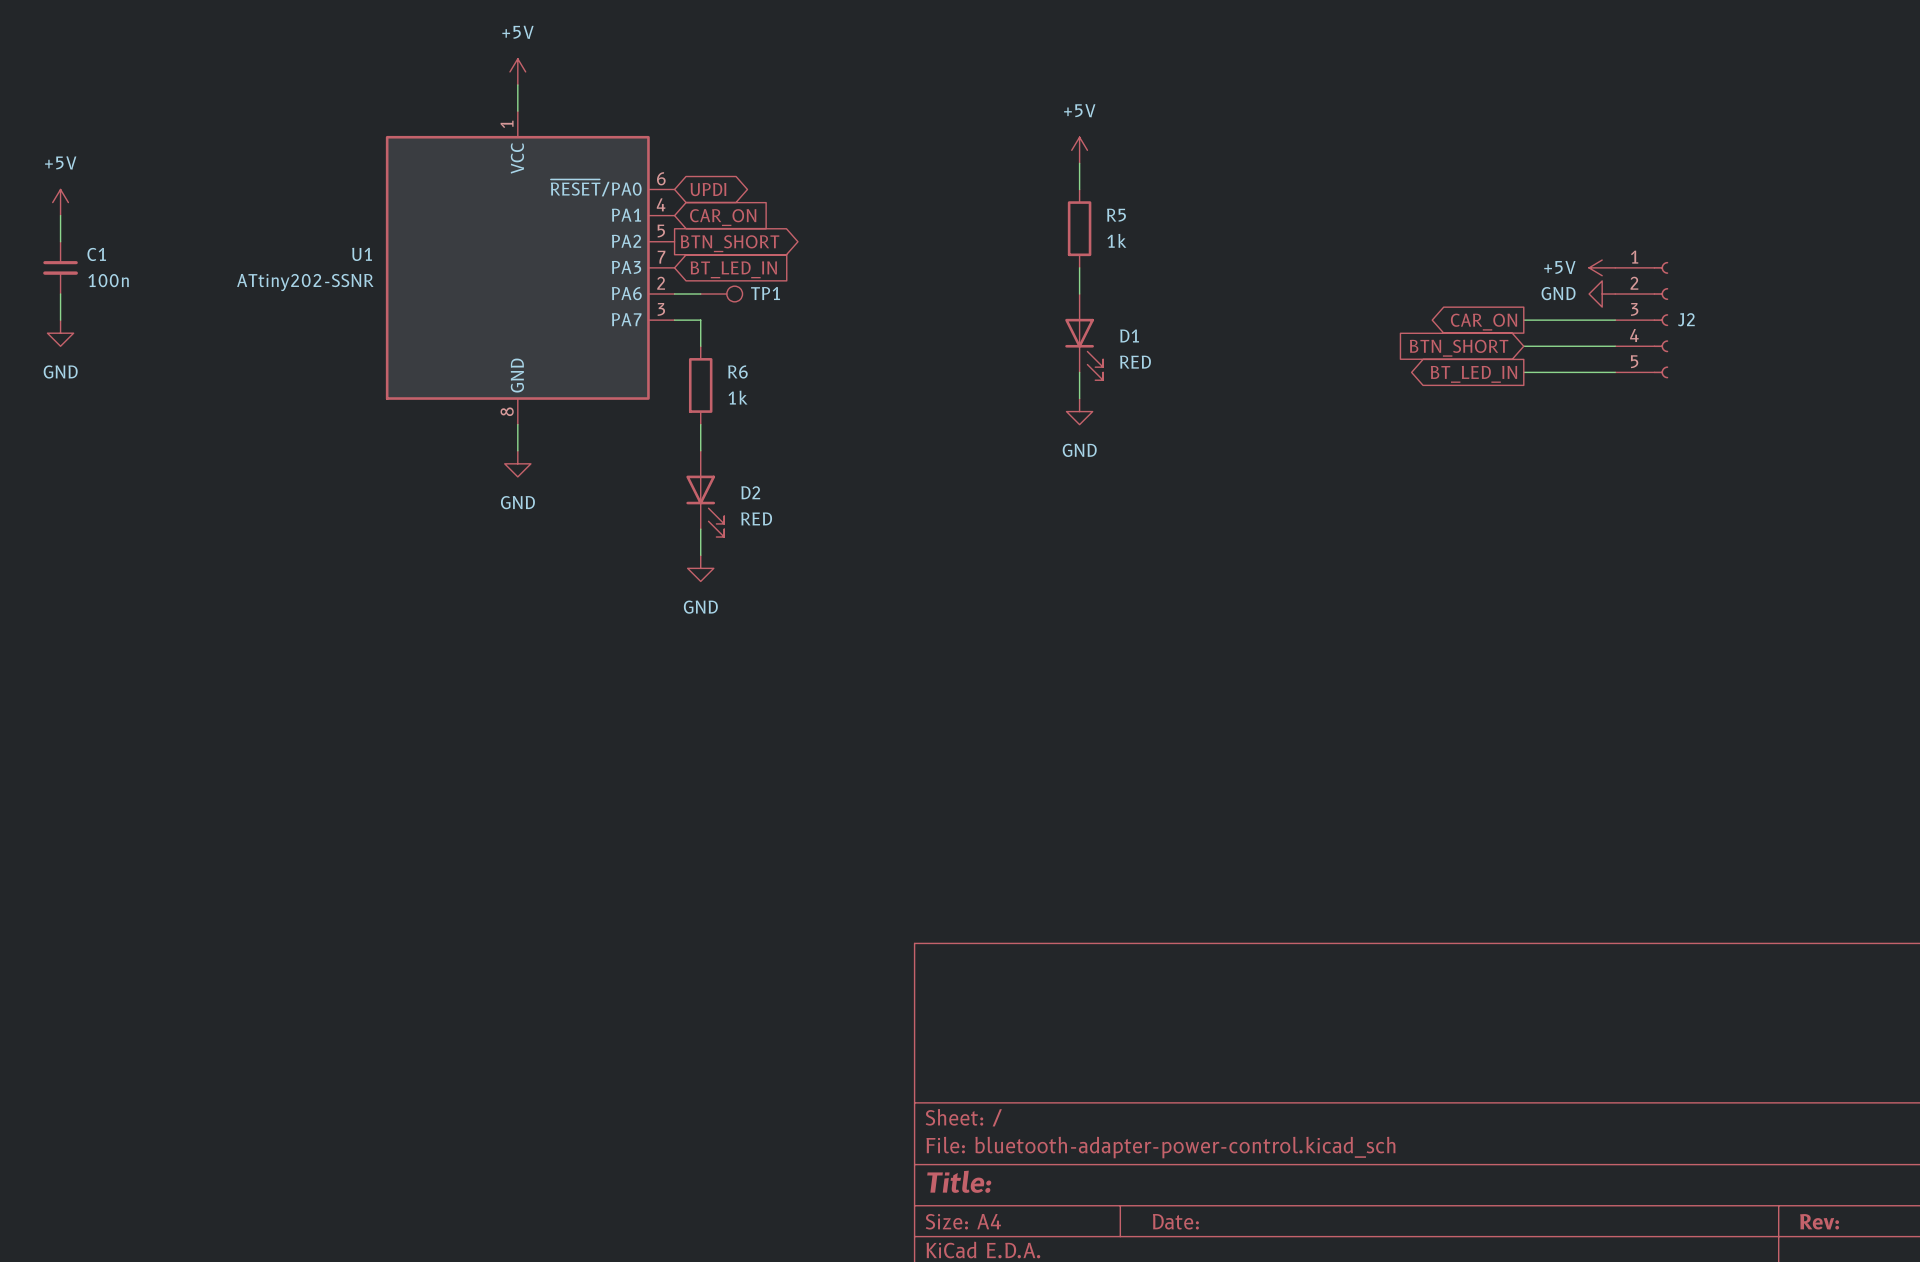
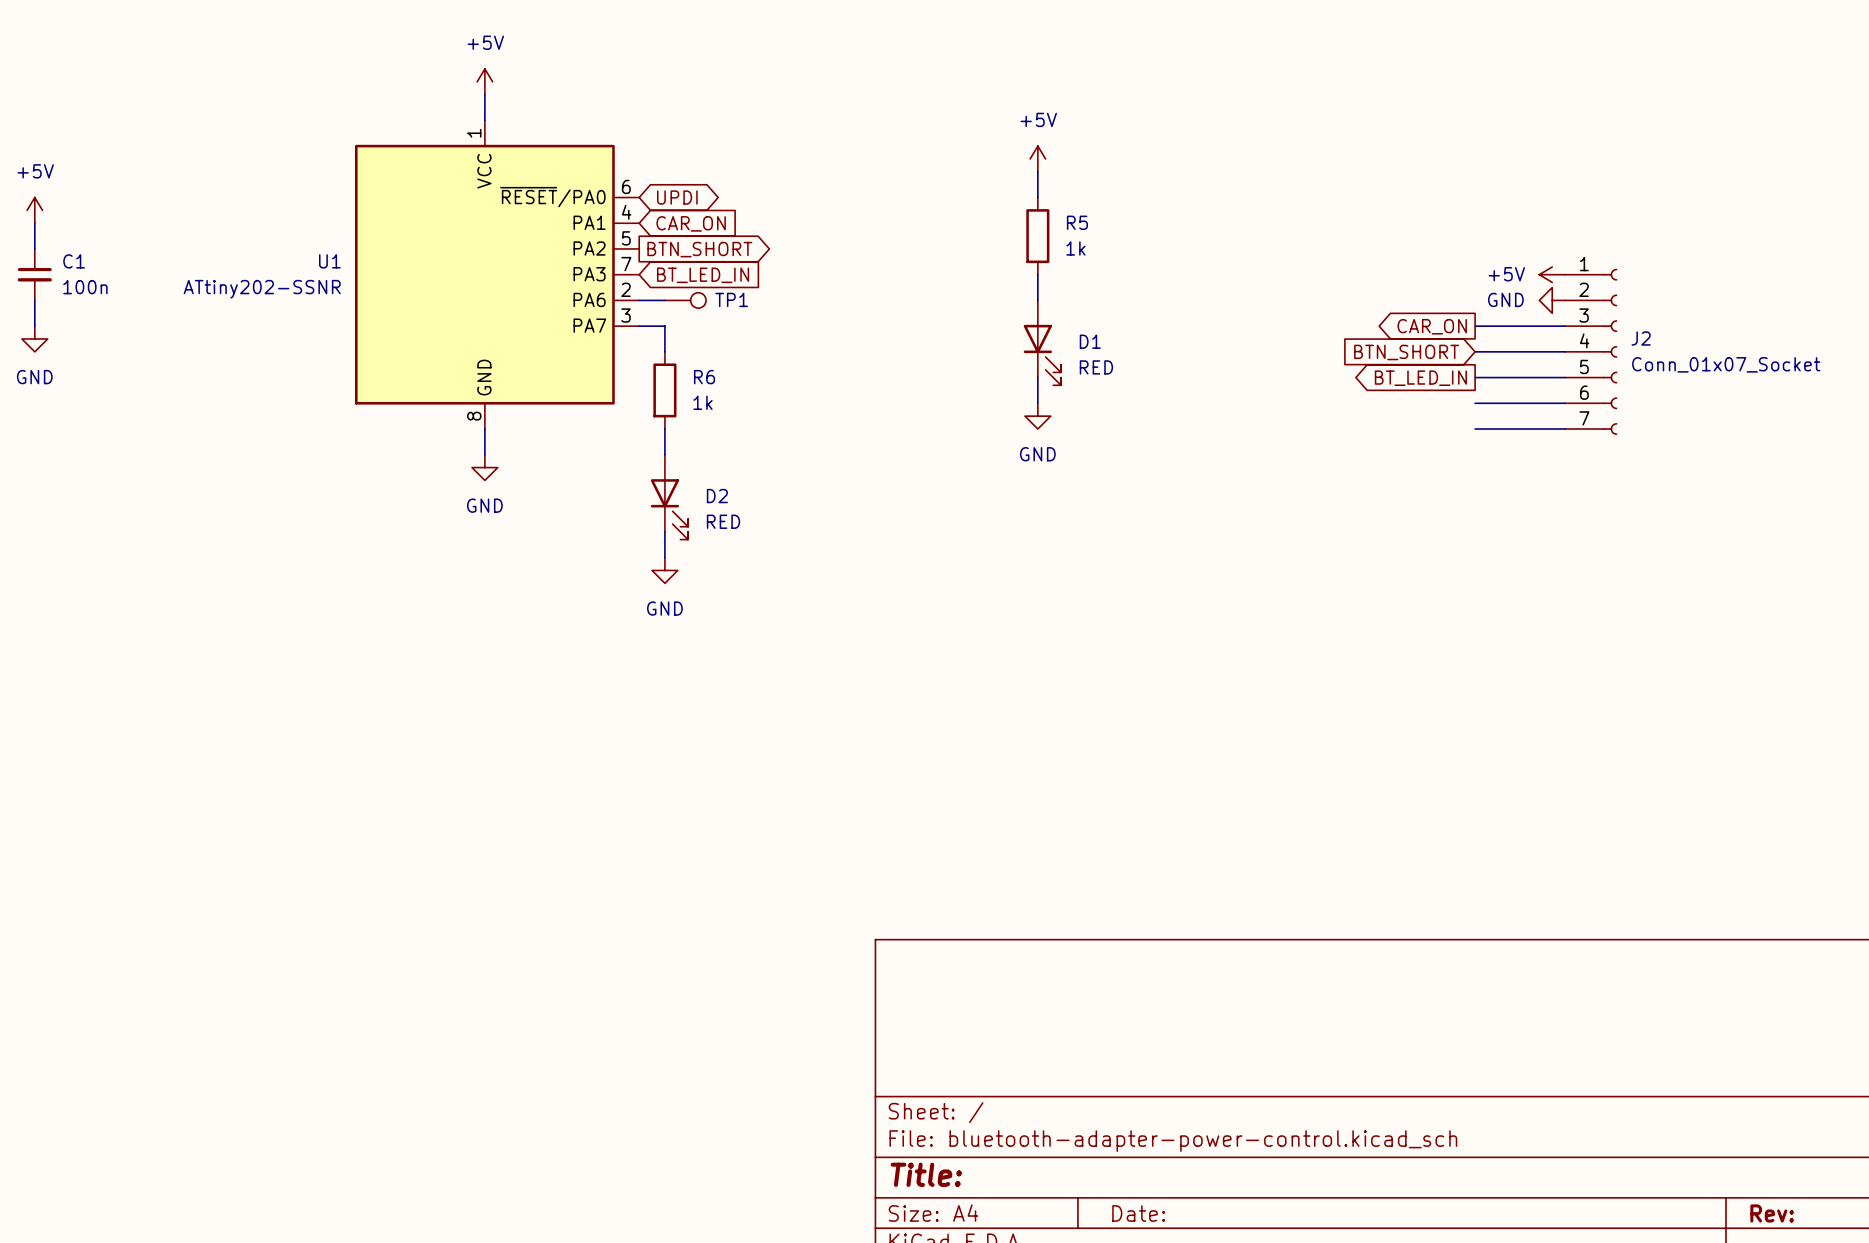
J2 symbol: [1615, 261, 1669, 379] -> [1565, 268, 1618, 435]
J2 value: none -> Conn_01x07_Socket (1726, 364)
wire: none -> (1475, 403) (1565, 403)
wire: none -> (1475, 429) (1565, 429)

